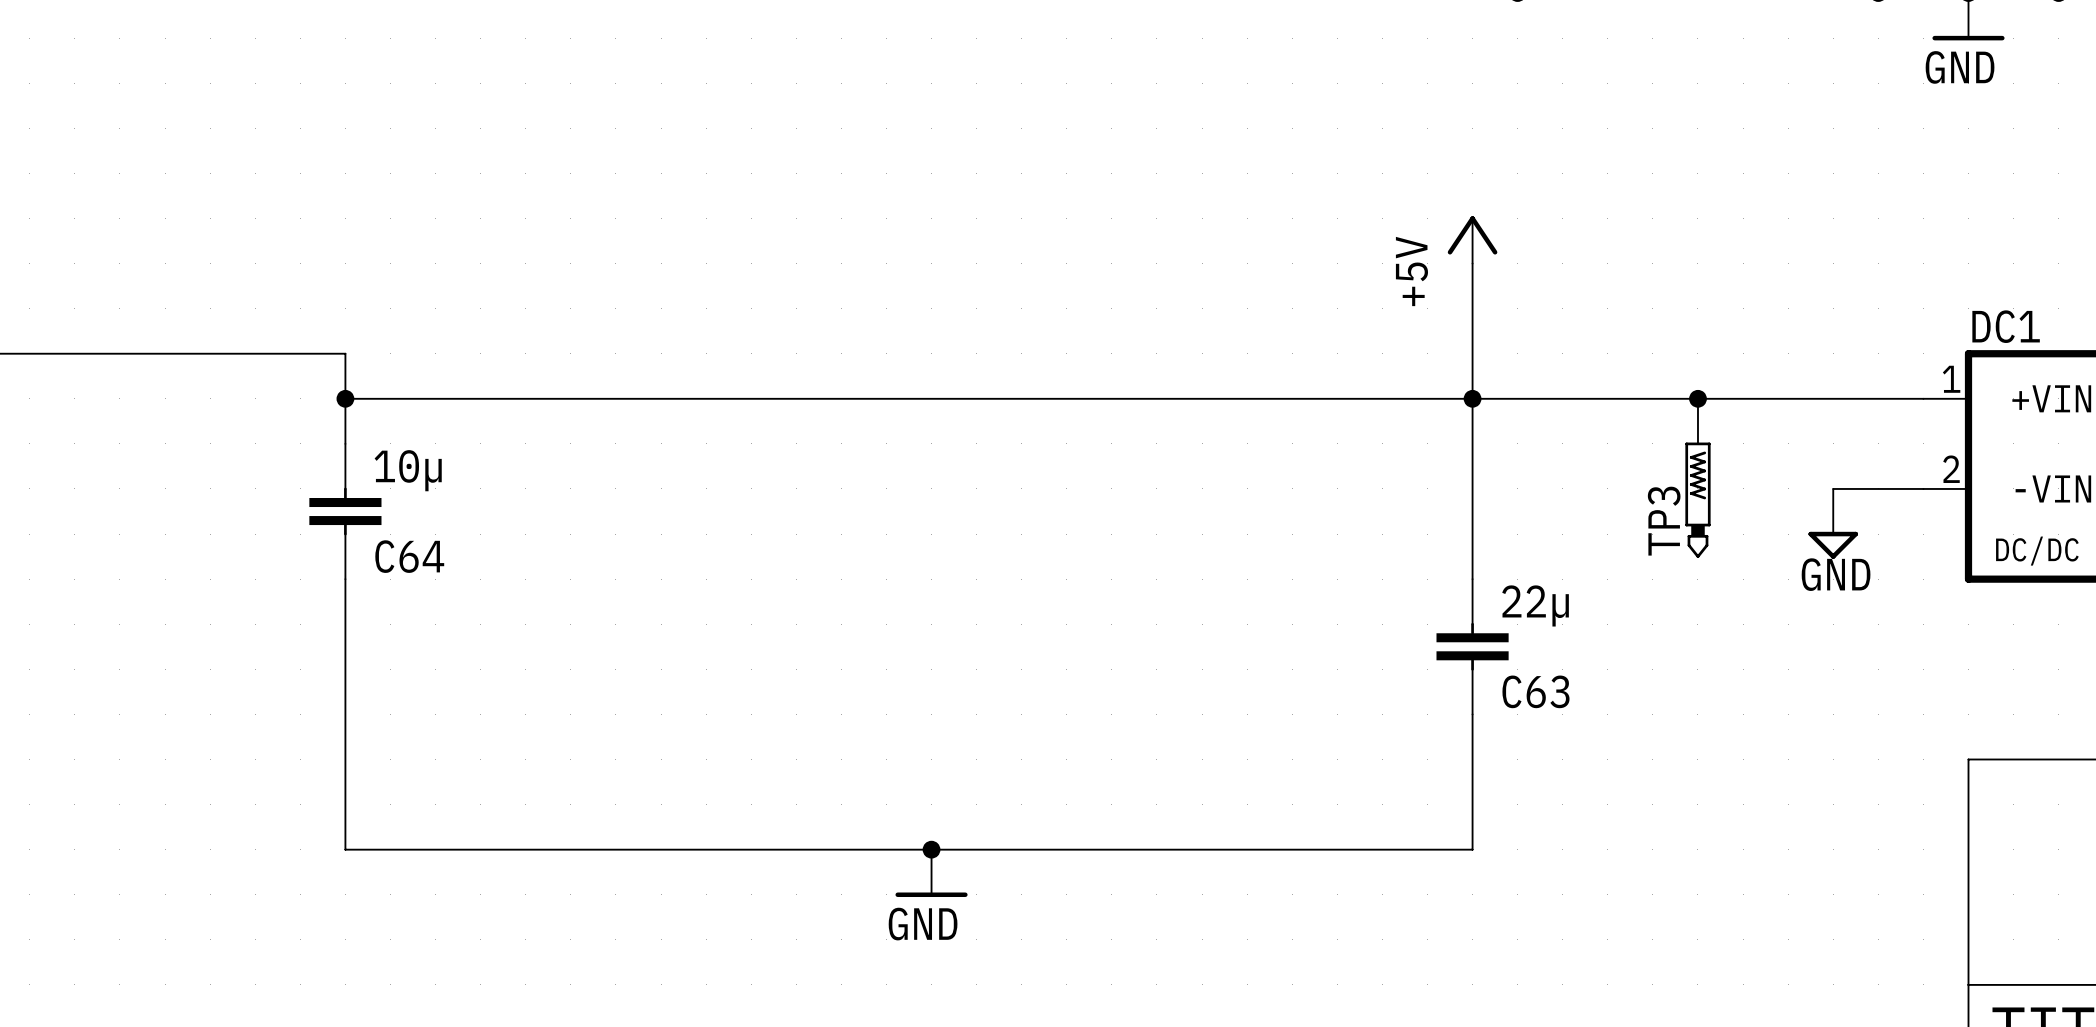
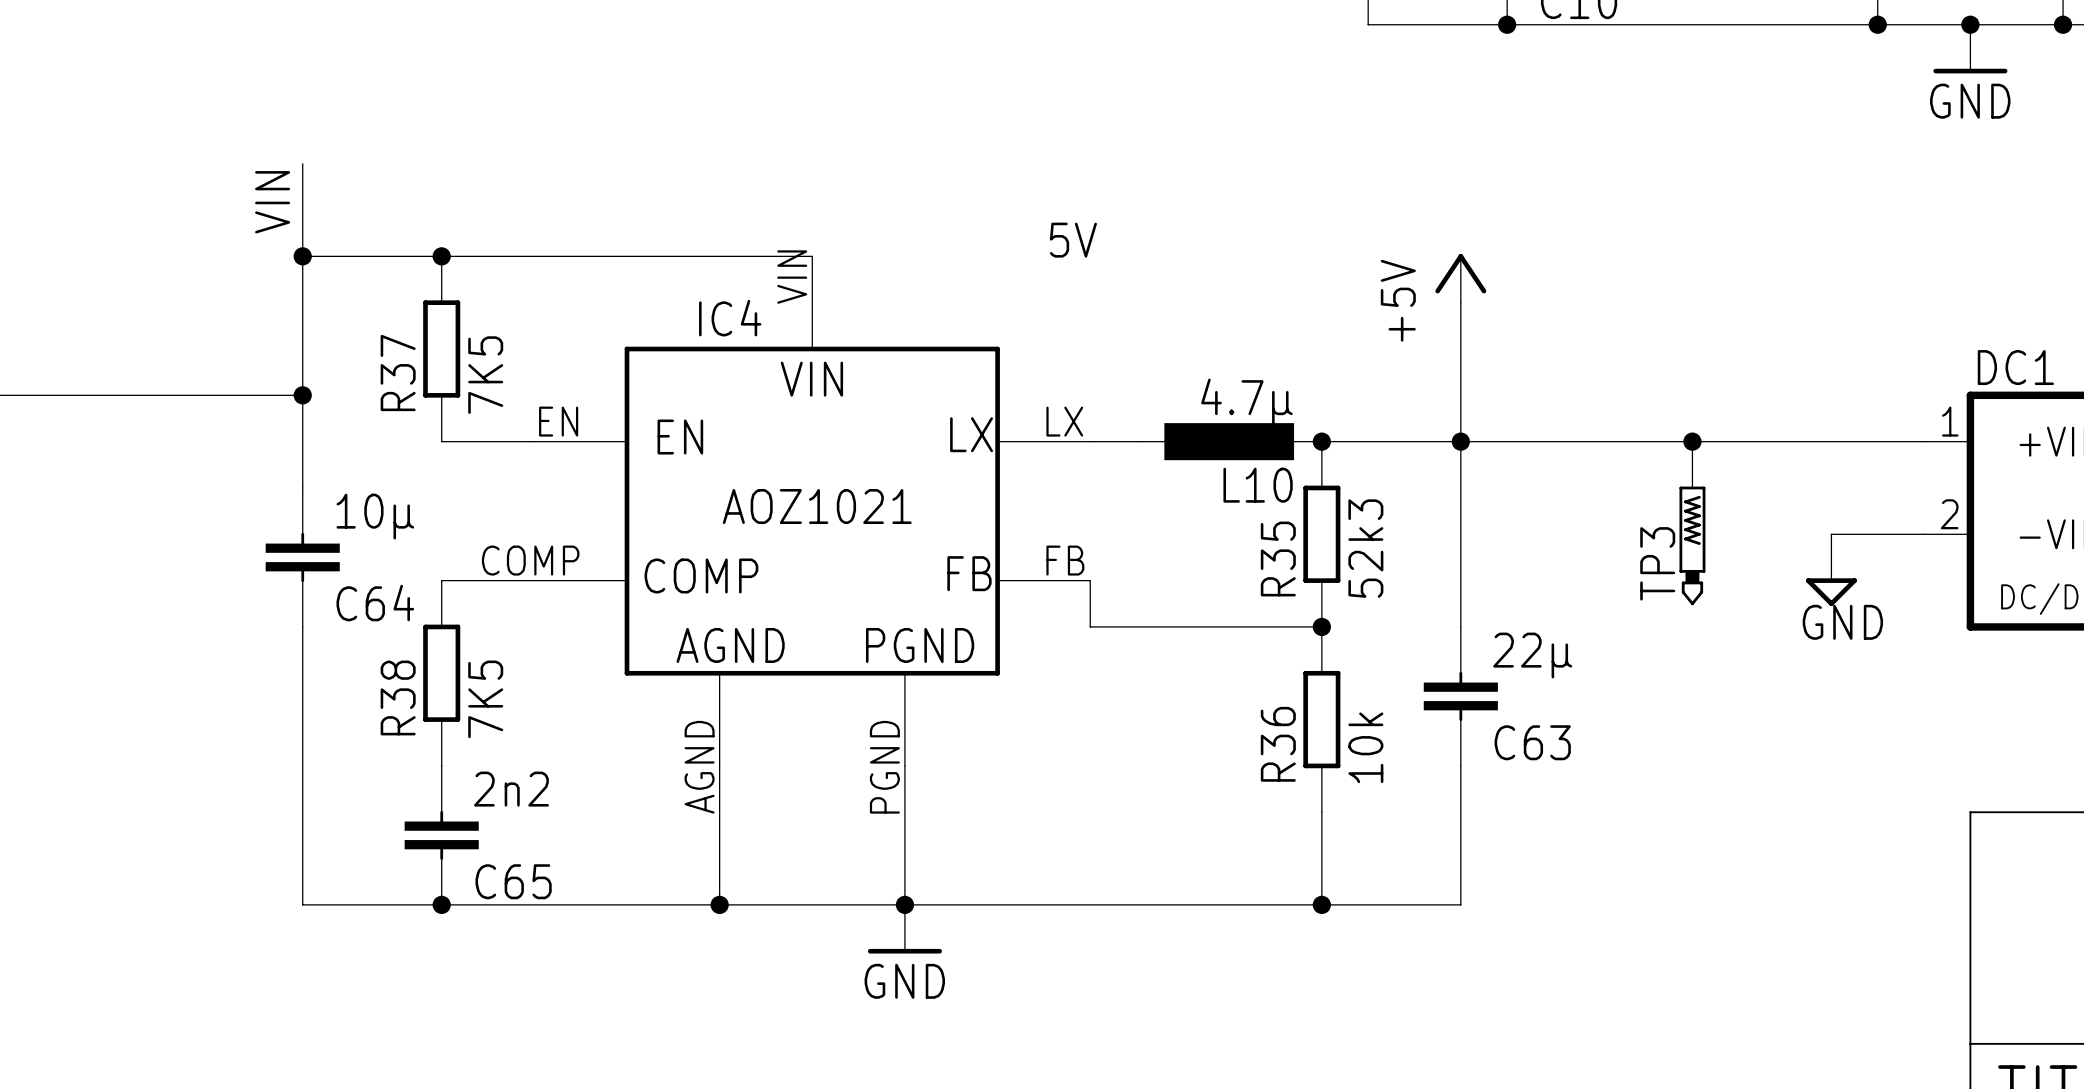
wire: none -> (302, 163) (302, 395)
label: none -> VIN (272, 202)
text: none -> 5V (1073, 240)
wire: none -> (302, 256) (812, 256)
junction: none -> (302, 256)
junction: none -> (441, 256)
R37: none -> 7K5 (441, 349)
wire: (345, 398) (480, 398) -> none
junction position: (345, 398) -> (302, 395)
wire: (570, 398) (1111, 398) -> none
L10: none -> 4.7µ (1229, 441)
junction: none -> (1321, 441)
IC4: none -> (812, 511)
R35: none -> 52k3 (1321, 534)
wire: none -> (441, 580) (534, 580)
wire: none -> (1090, 580) (1090, 626) (1321, 626)
junction: none -> (1321, 626)
R38: none -> 7K5 (441, 673)
R36: none -> 10k (1321, 719)
wire: none -> (719, 765) (719, 904)
wire: none -> (904, 765) (904, 904)
wire: none -> (1321, 812) (1321, 904)
C65: none -> 2n2 (441, 835)
junction: none -> (441, 904)
junction: none -> (719, 904)
junction: none -> (1321, 904)

